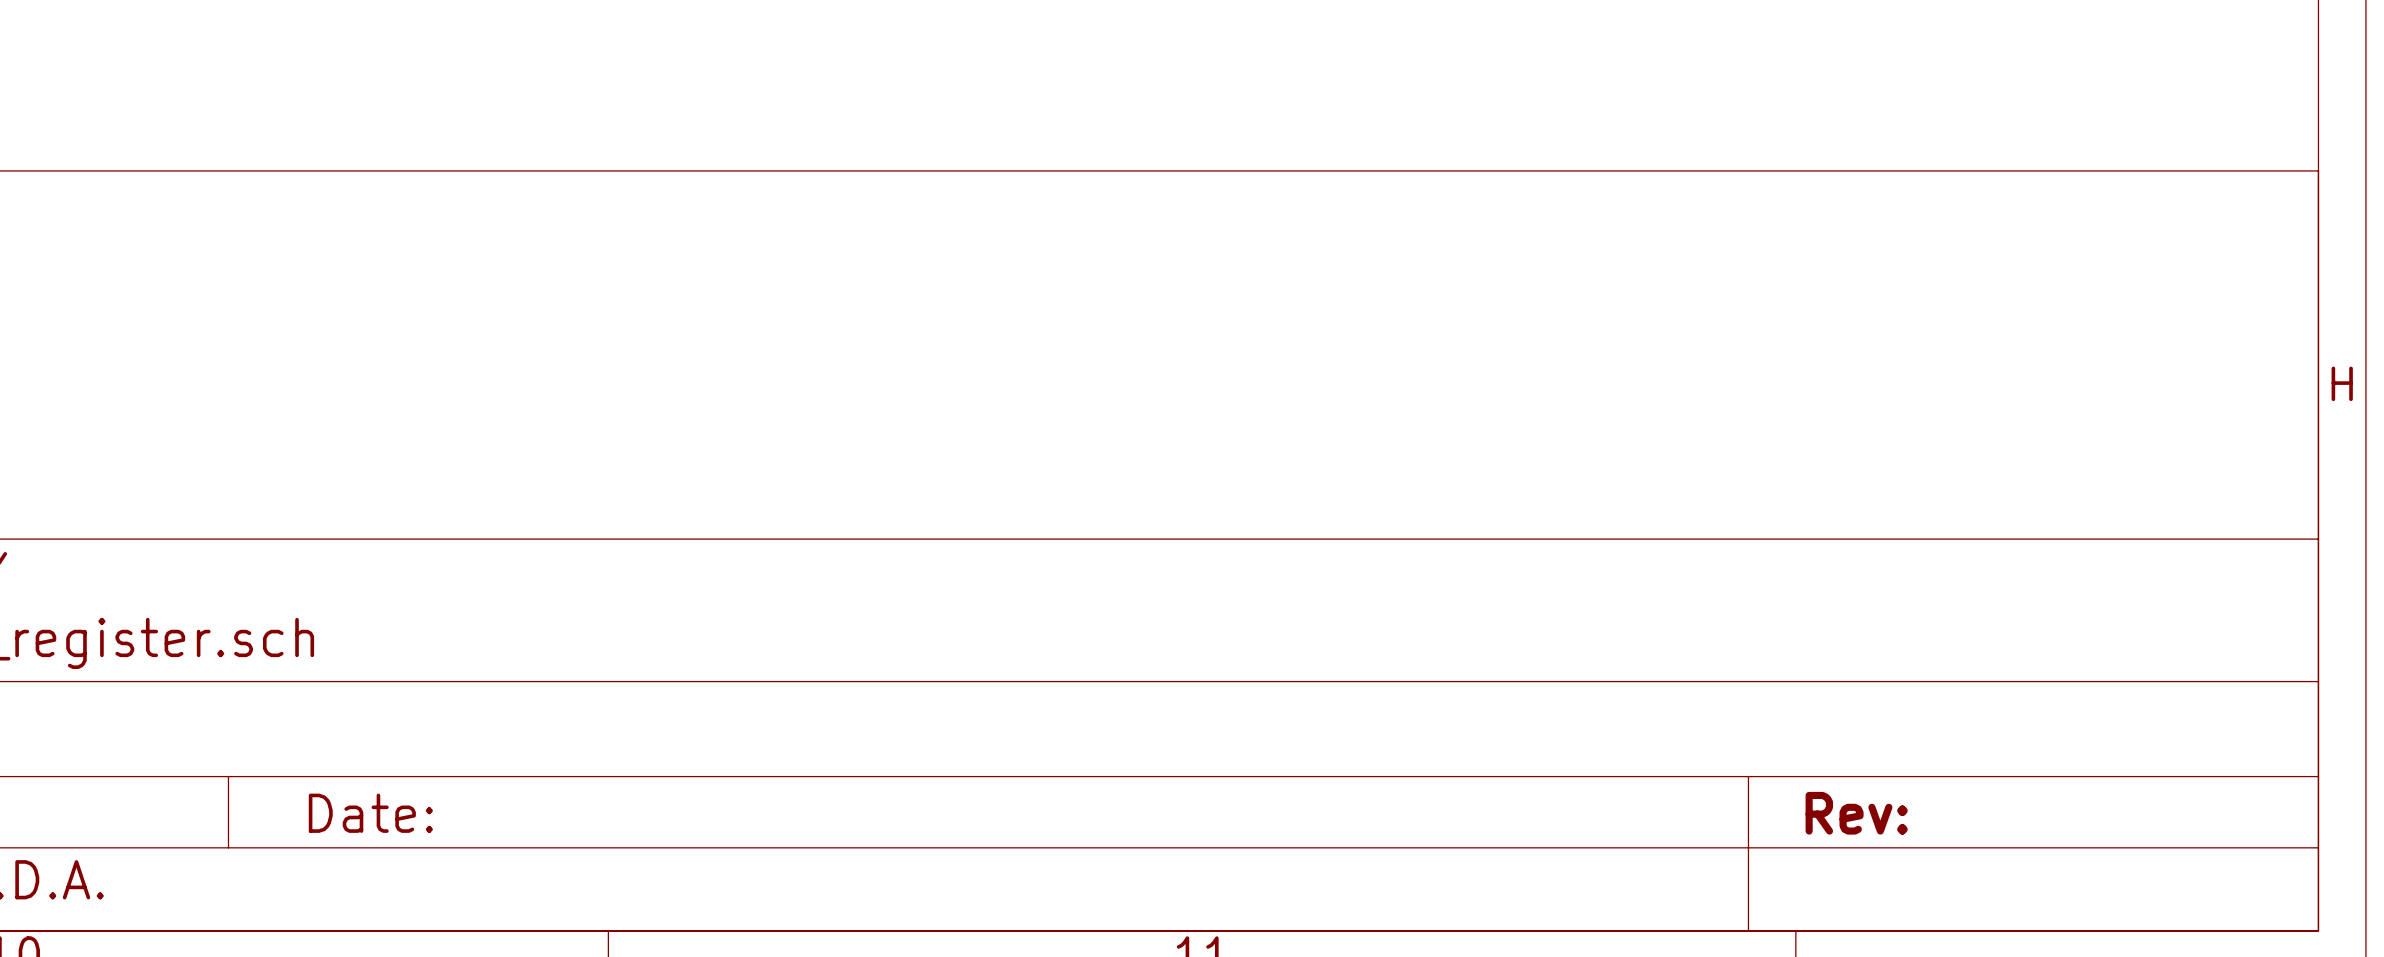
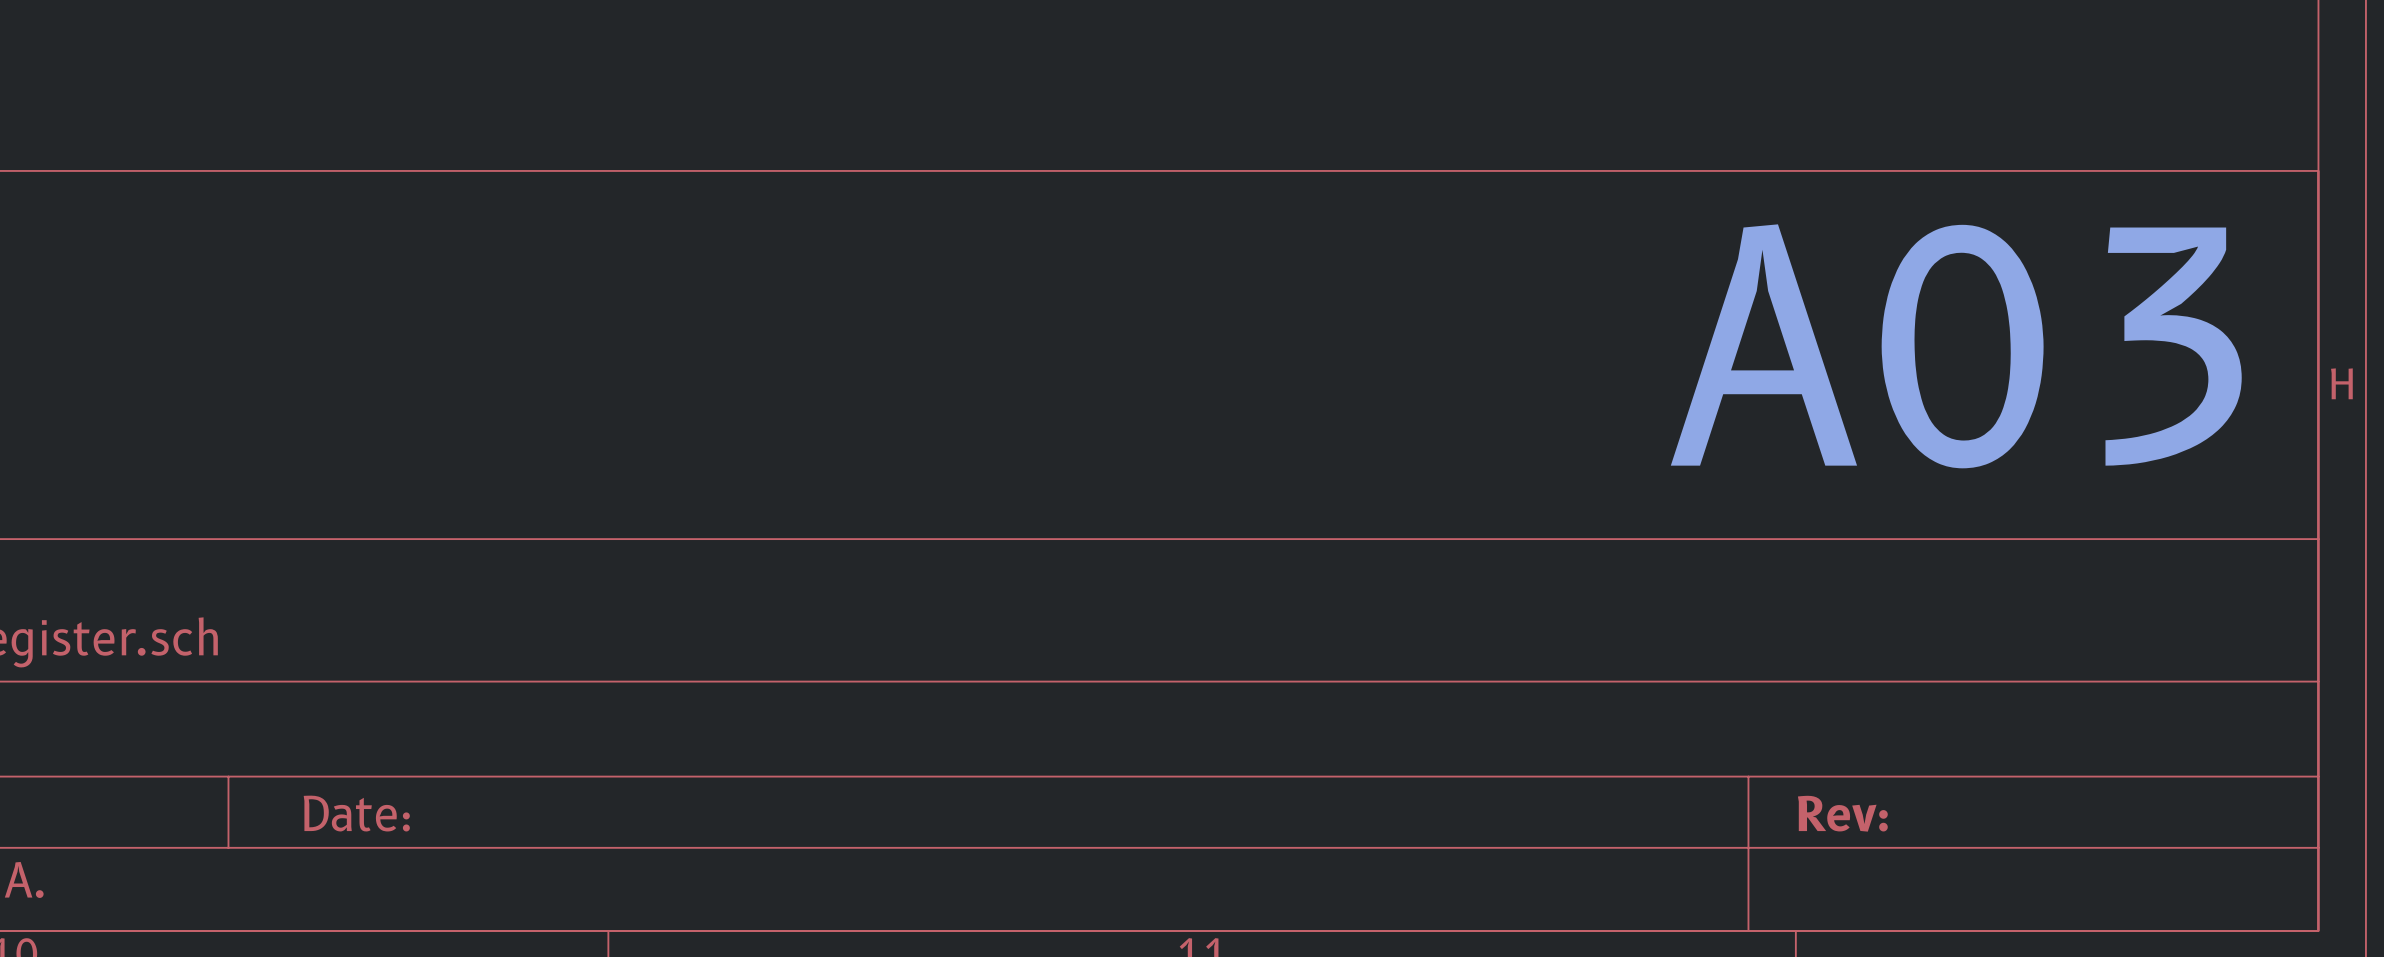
text: none -> A03 (1956, 346)

